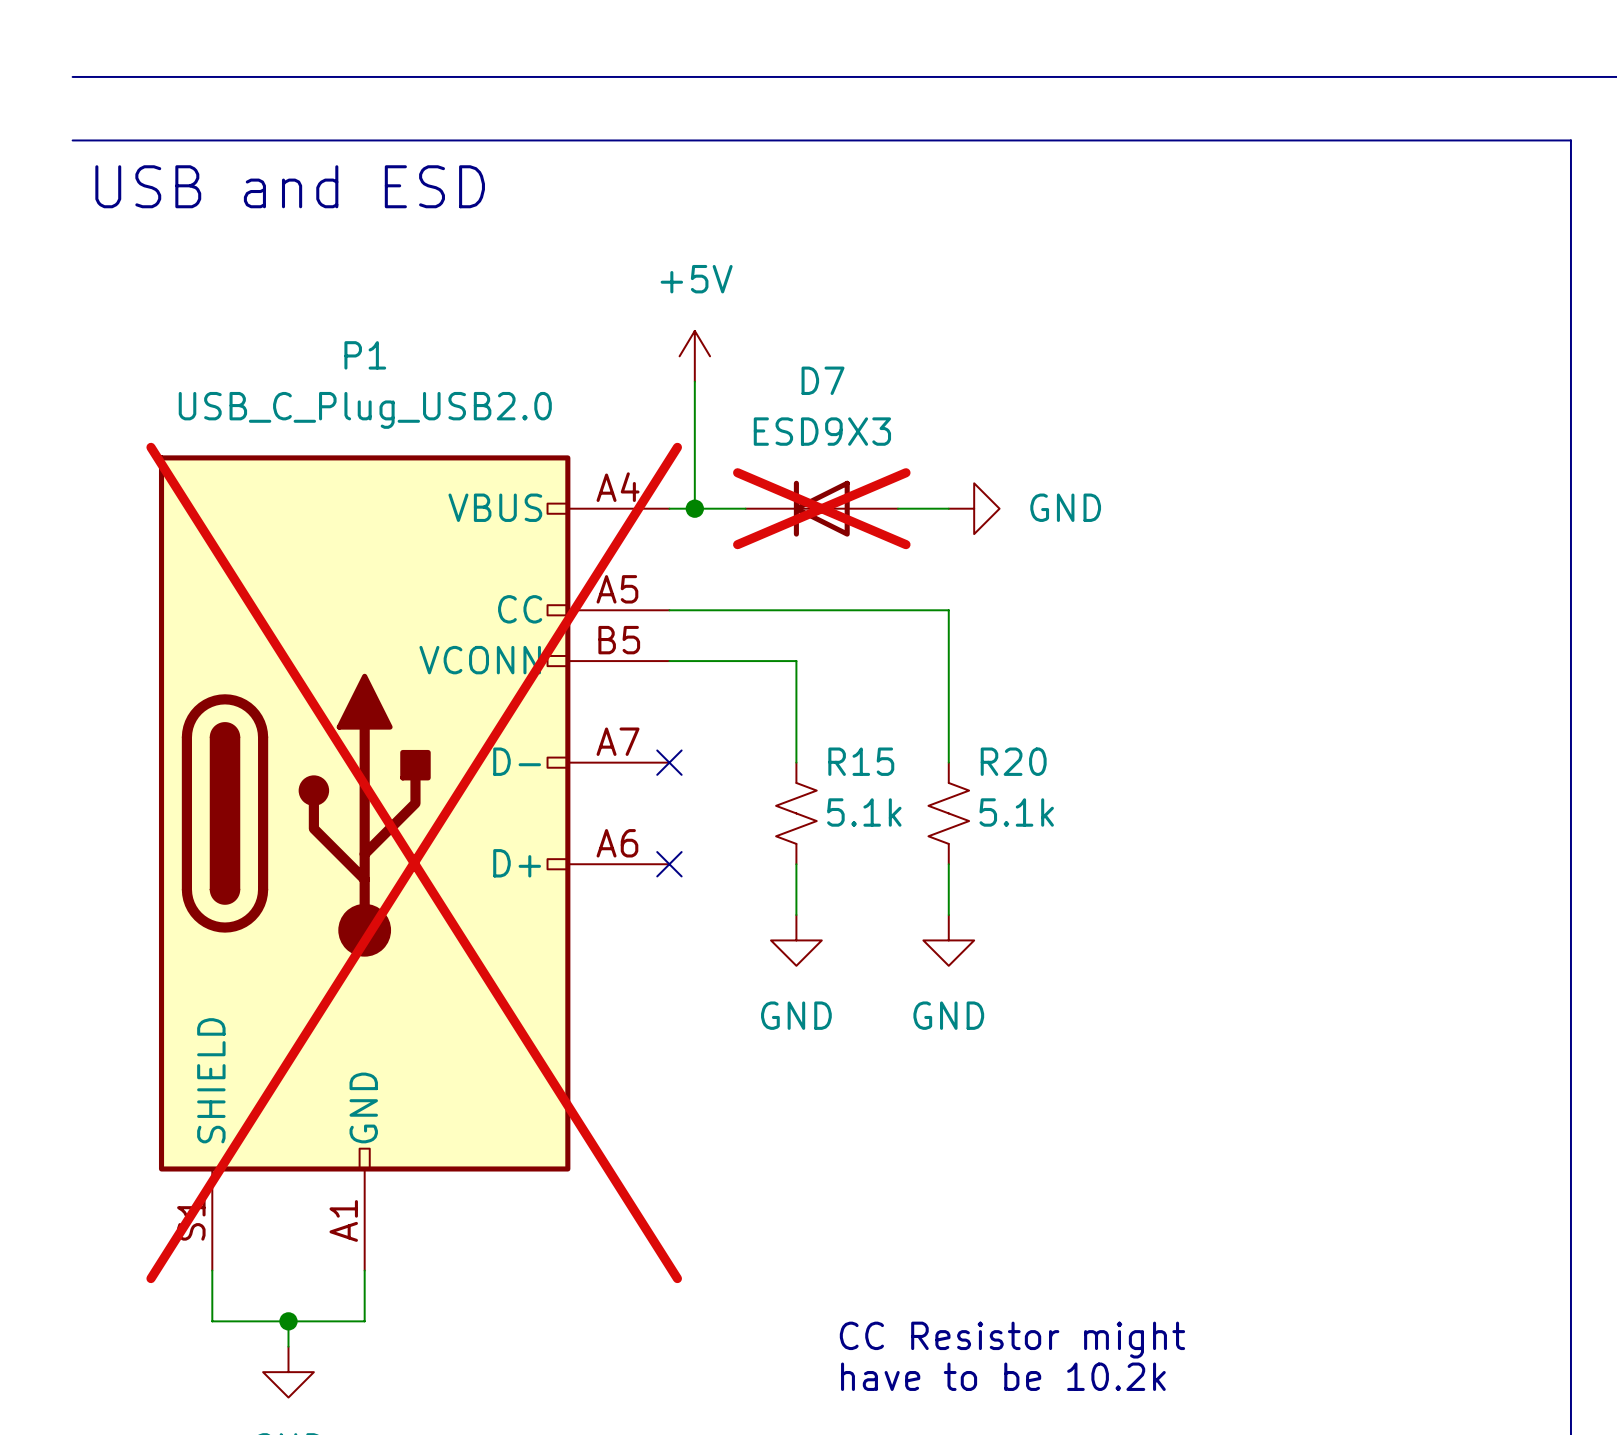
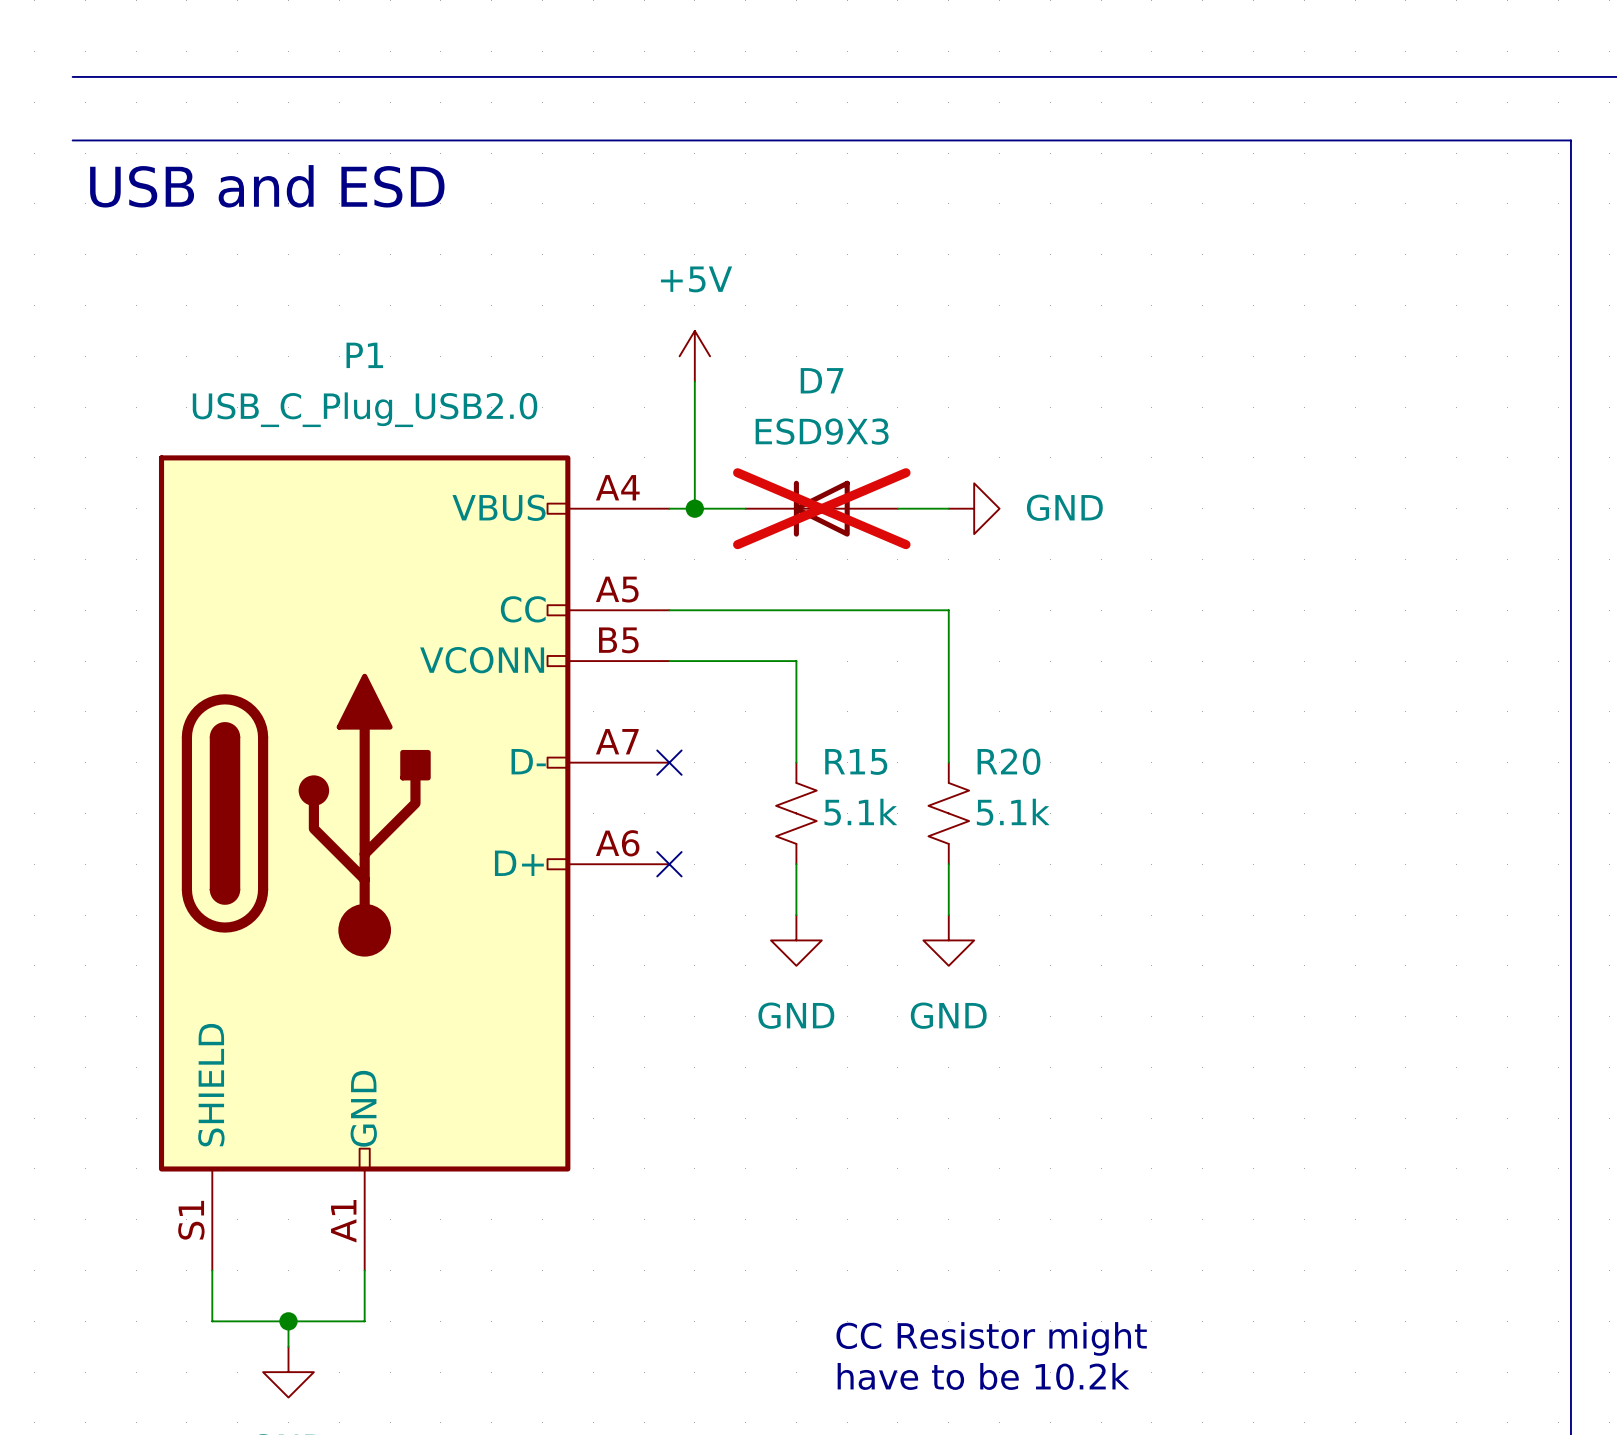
P1 do-not-place cross: (414, 862) -> none

